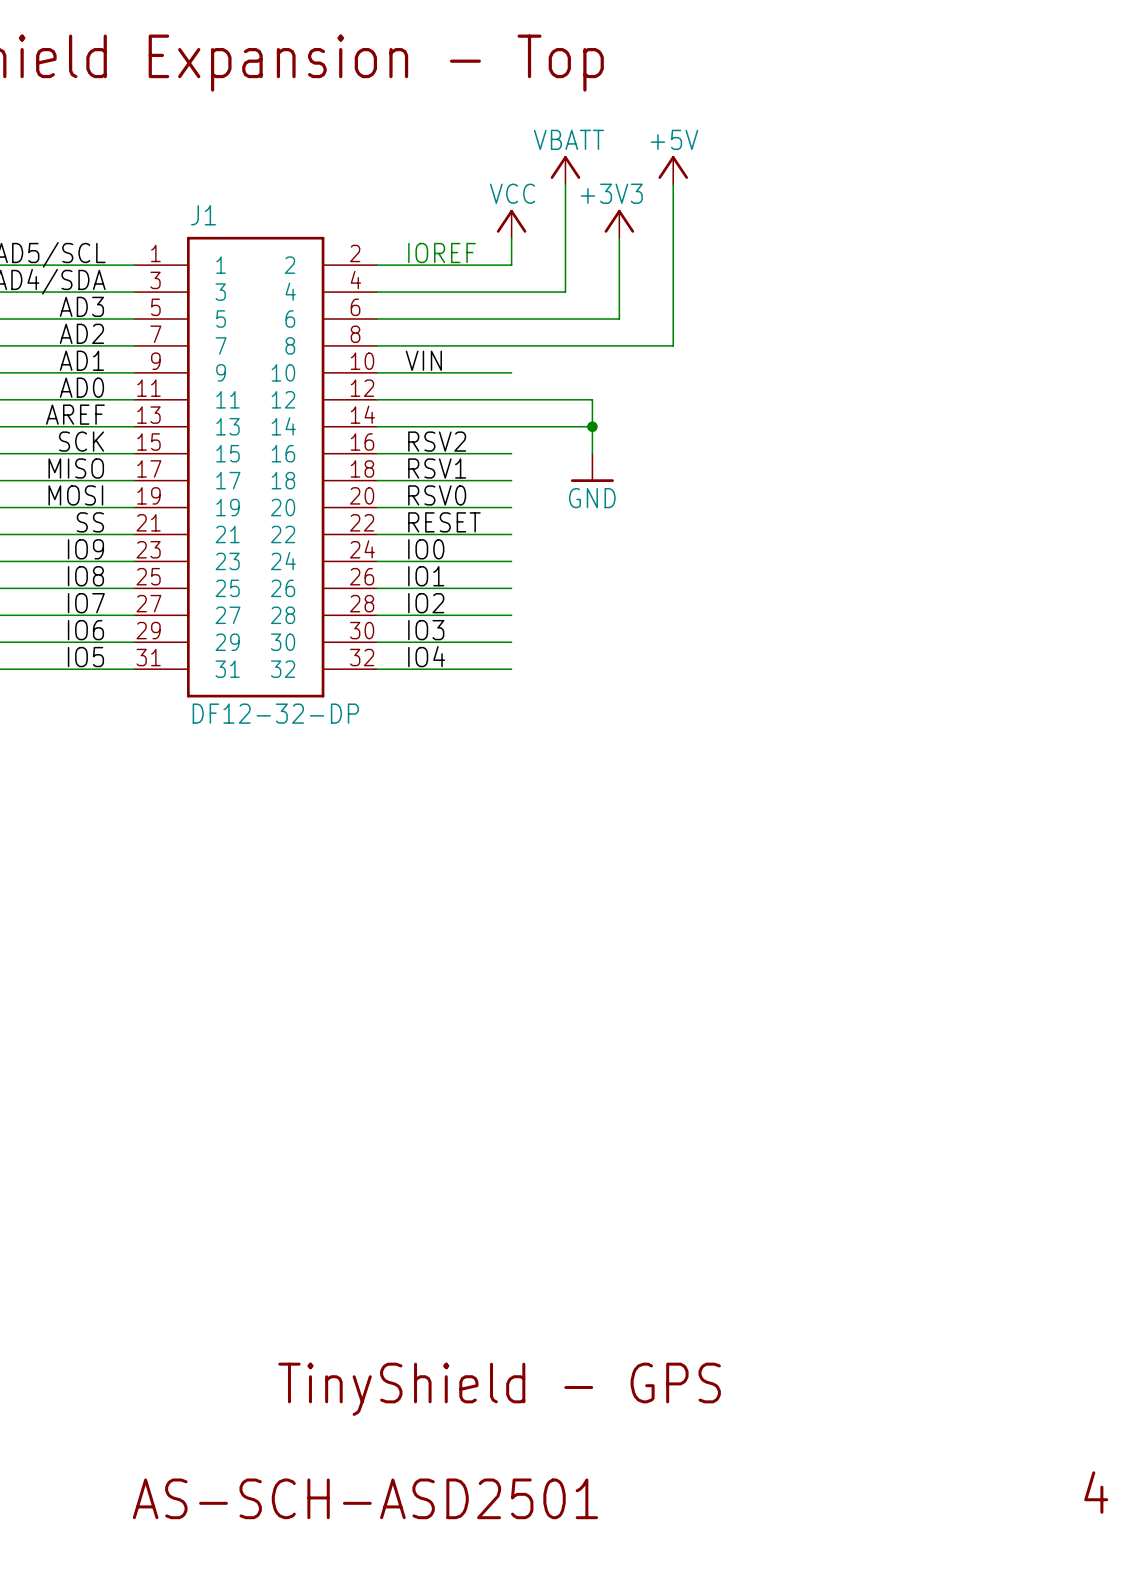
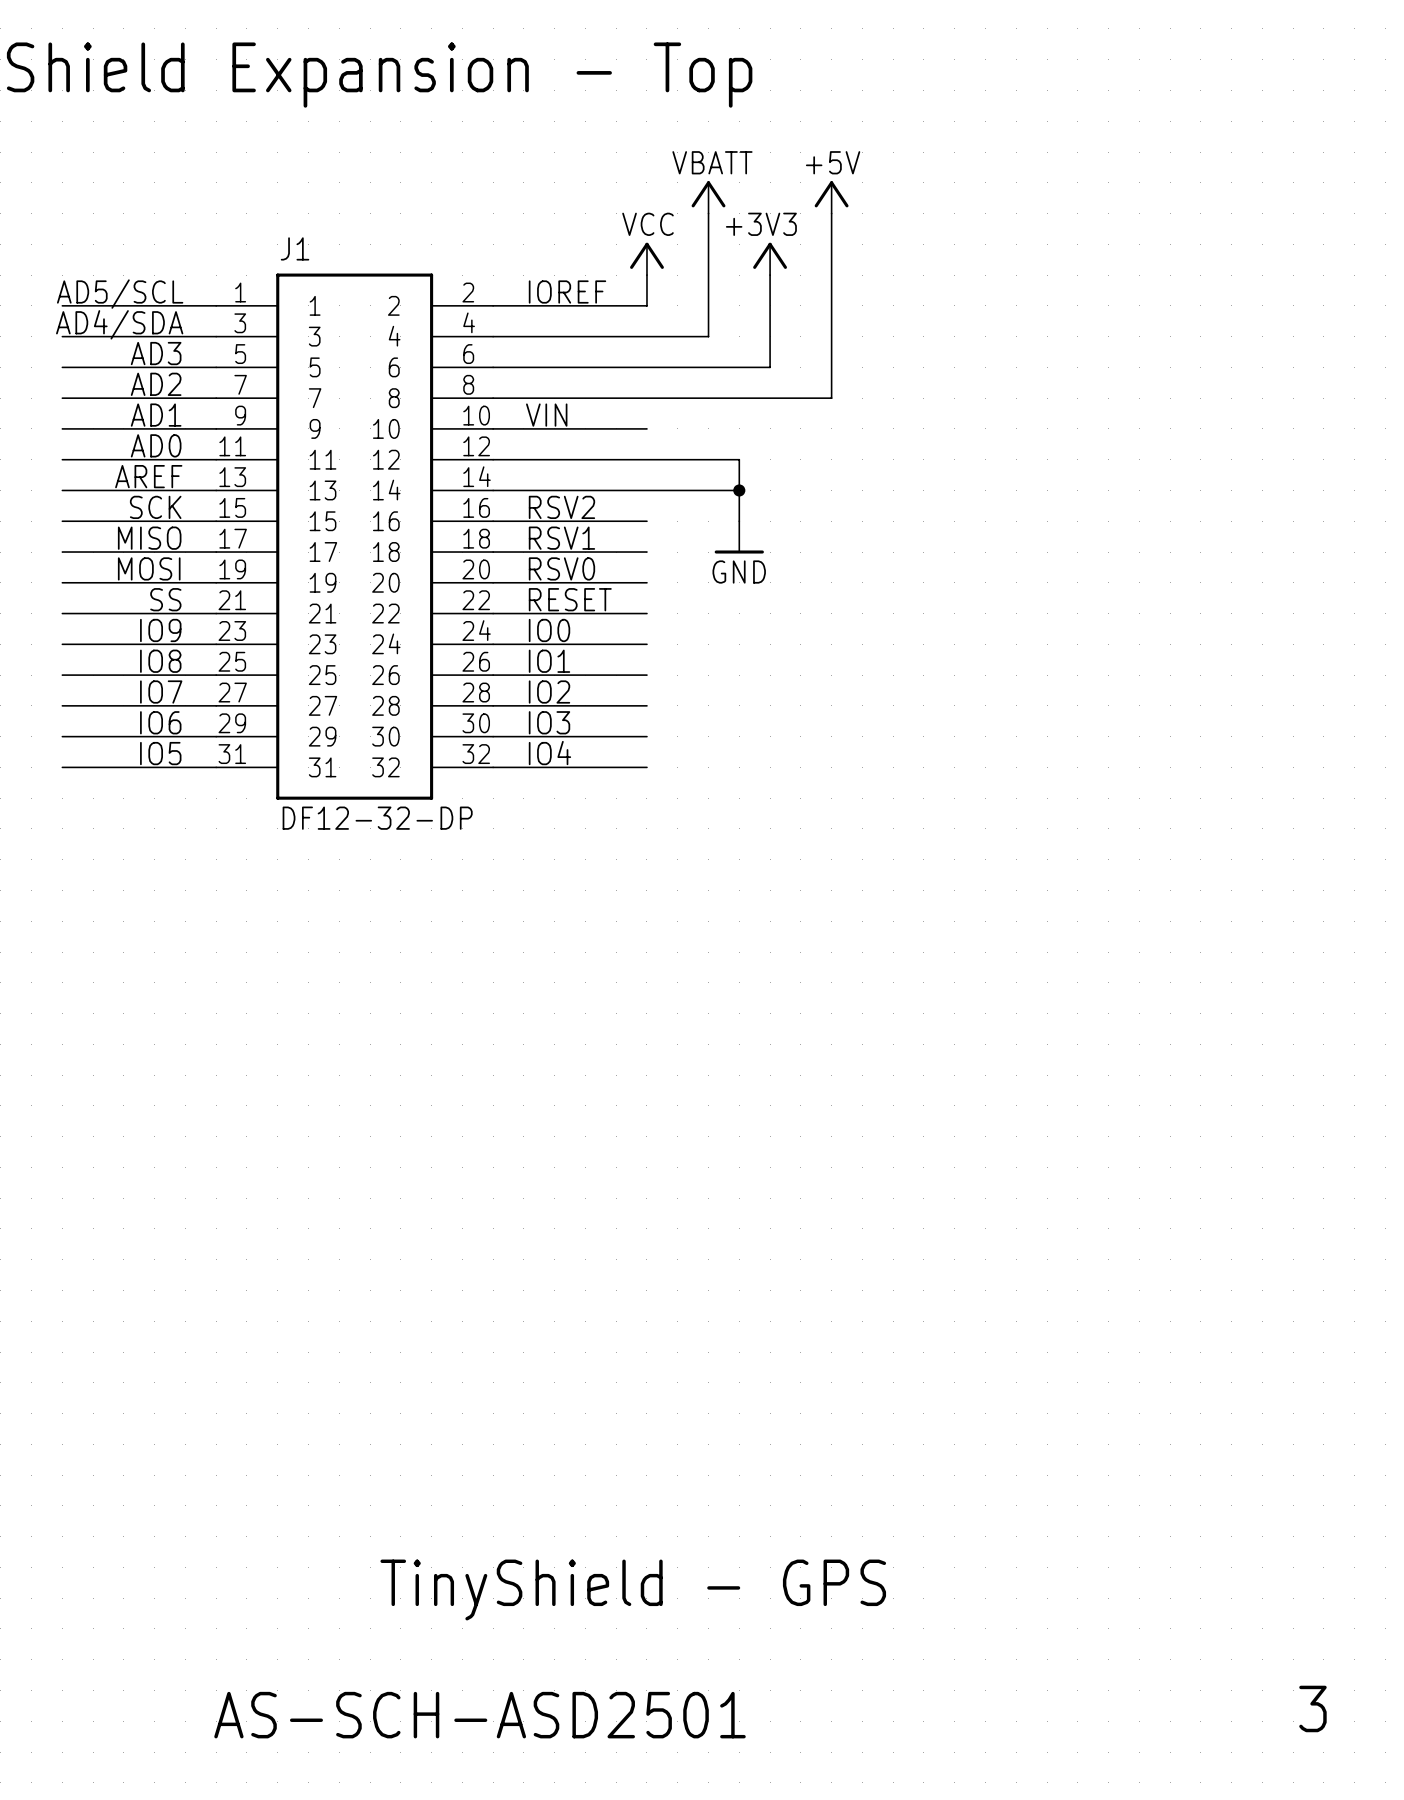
text: 4 (1096, 1492) -> 3 (1312, 1708)

